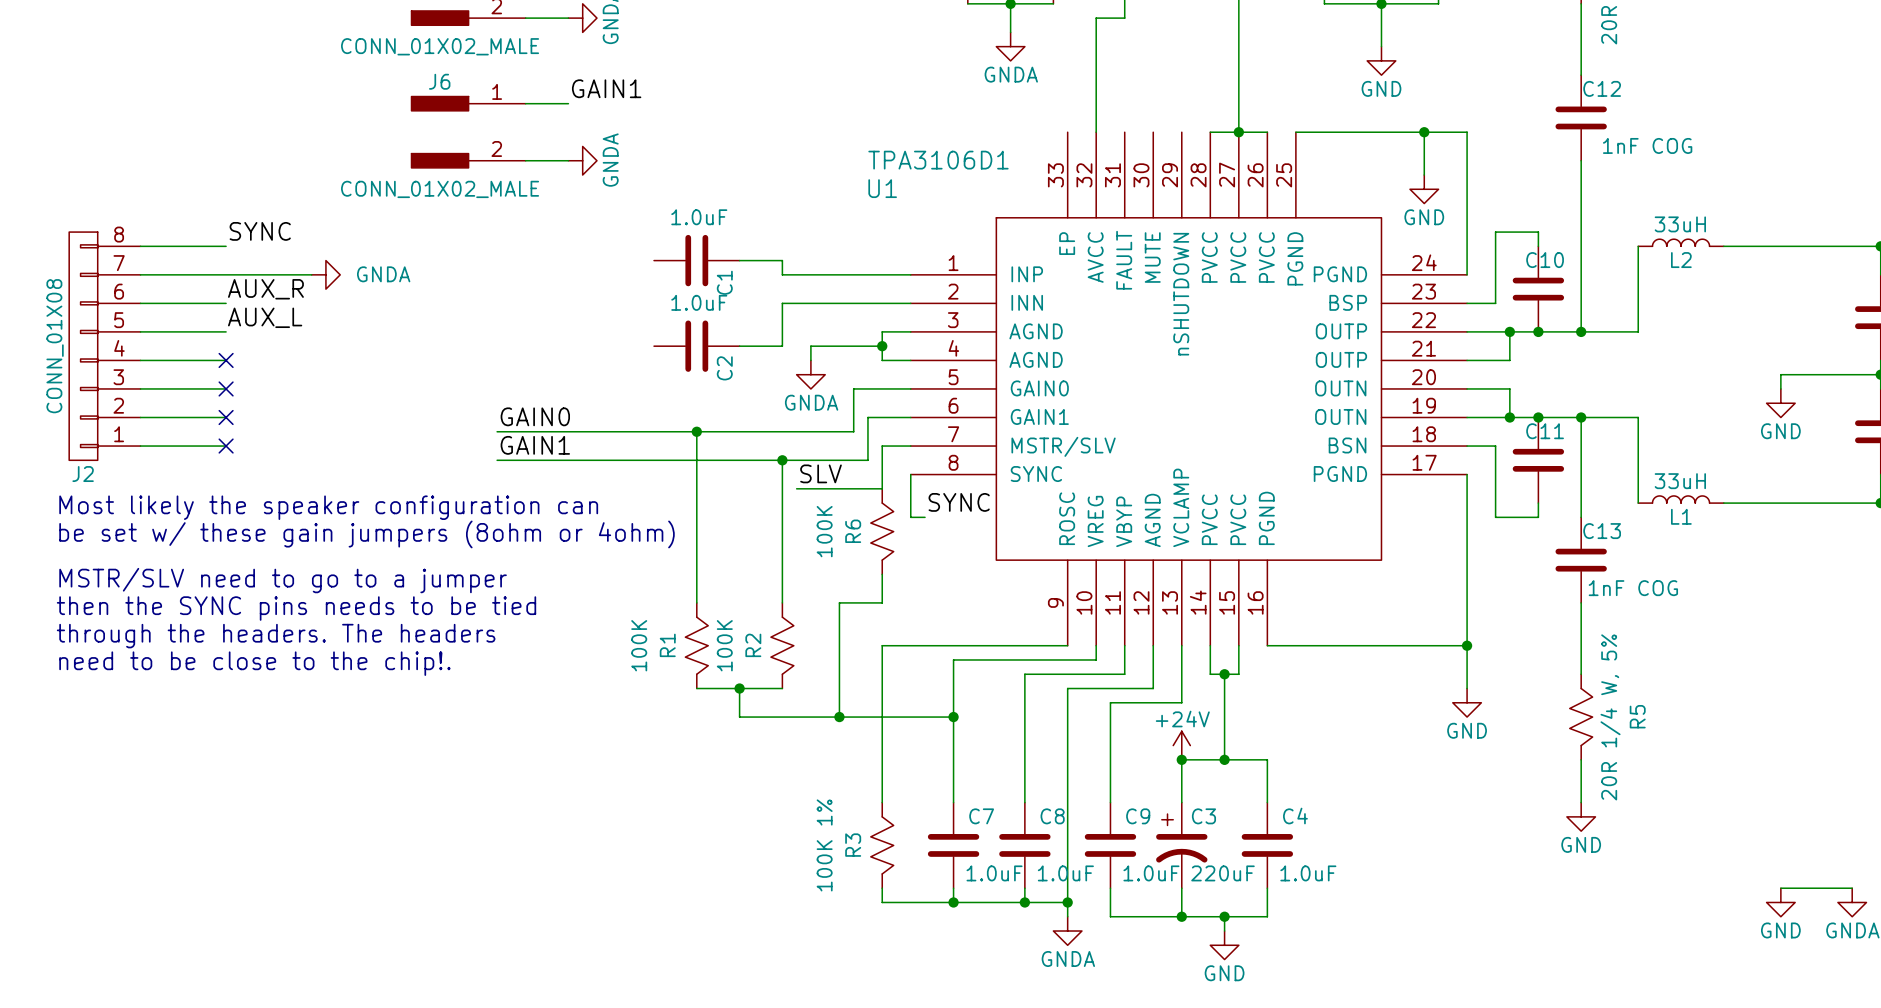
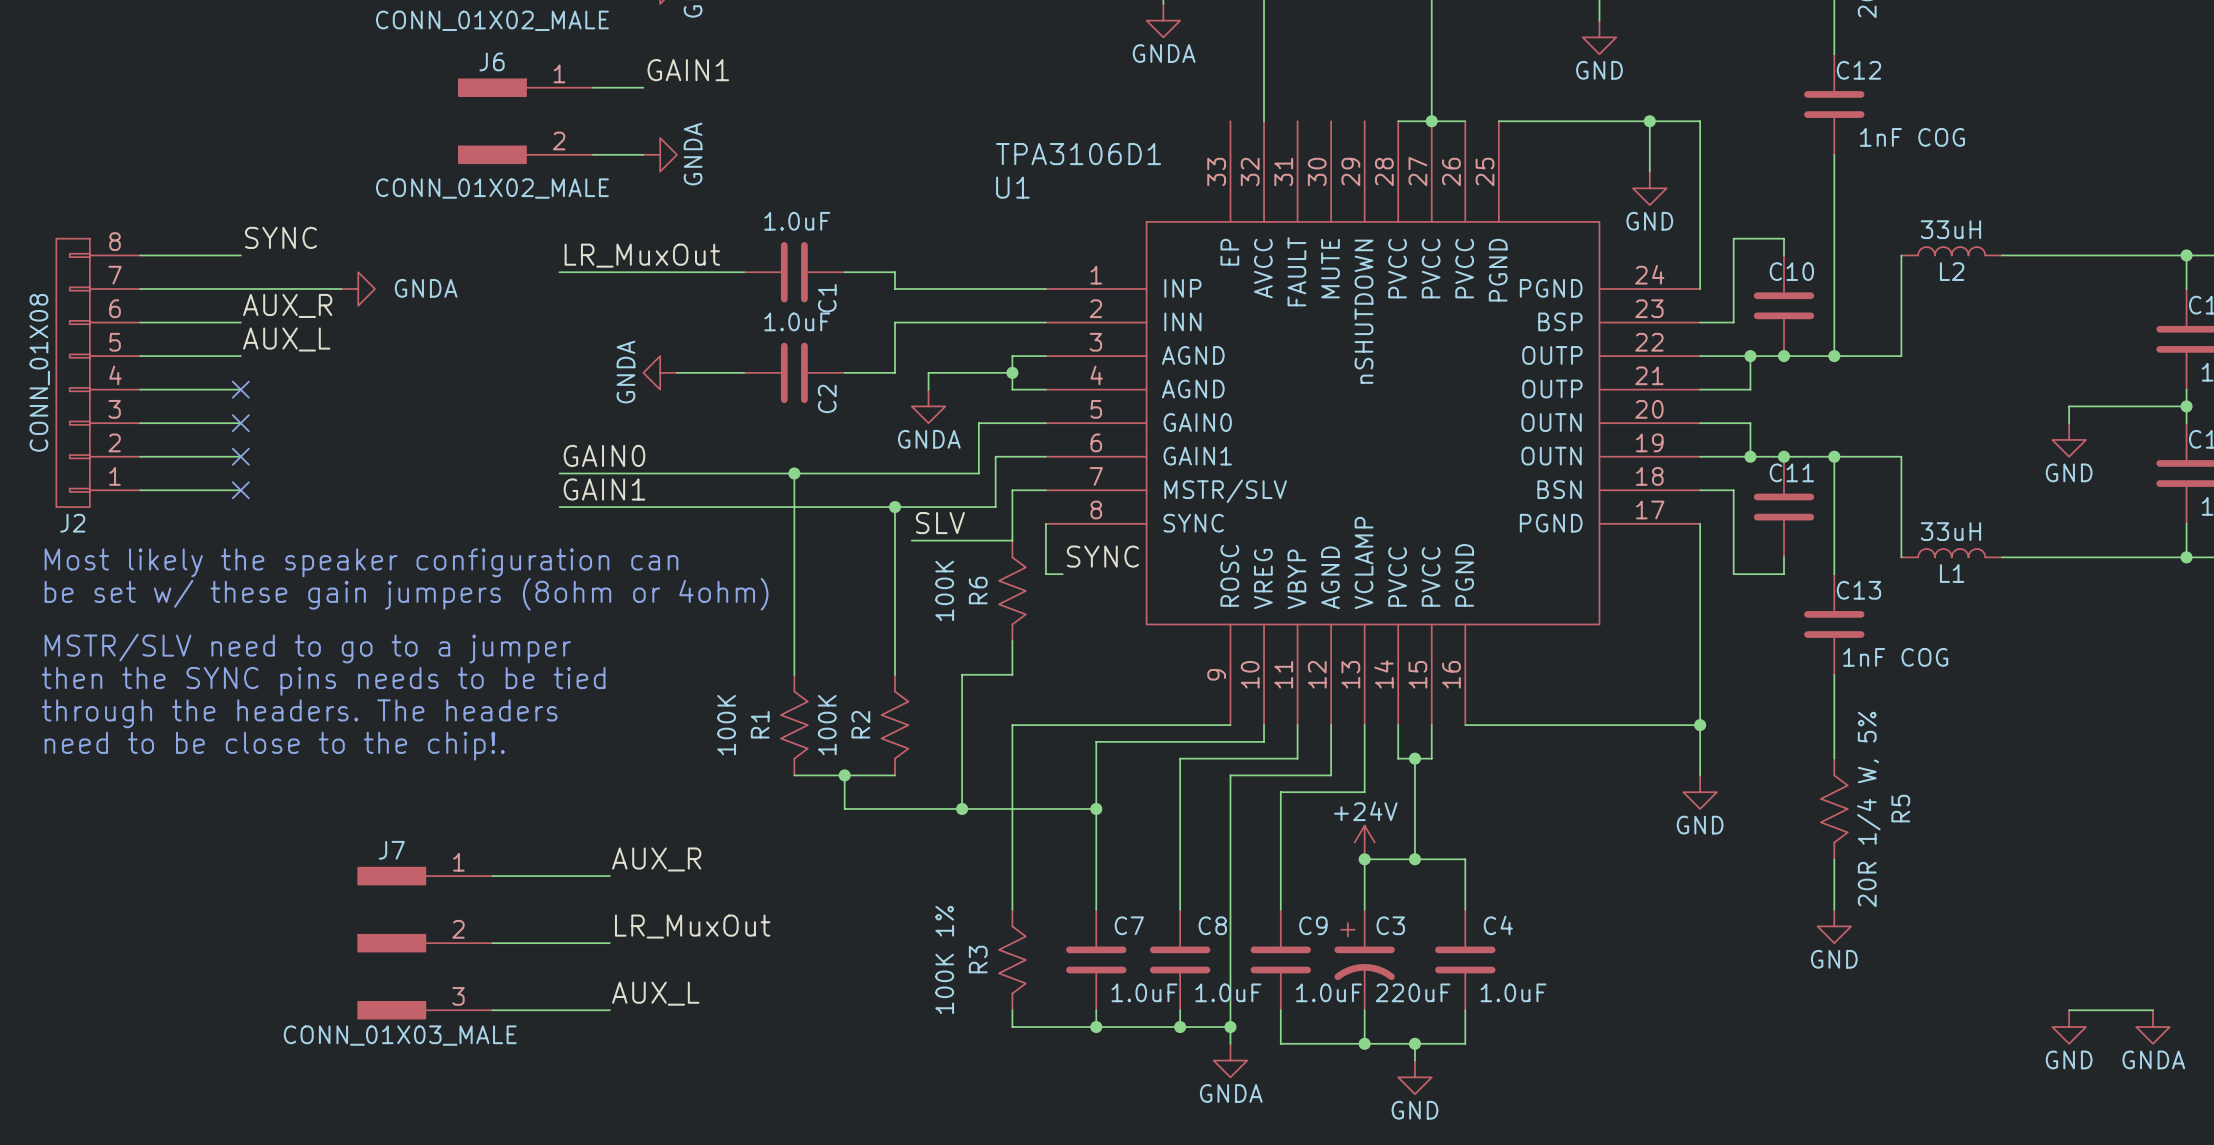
label: none -> LR_MuxOut (642, 255)
wire: none -> (559, 272) (744, 272)
power symbol: none -> GNDA (660, 372)
wire: none -> (676, 372) (744, 372)
label: none -> AUX_R (656, 859)
wire: none -> (492, 876) (609, 876)
label: none -> LR_MuxOut (692, 926)
J7: none -> CONN_01X03_MALE (425, 943)
wire: none -> (492, 943) (609, 943)
label: none -> AUX_L (655, 993)
wire: none -> (492, 1010) (609, 1010)

